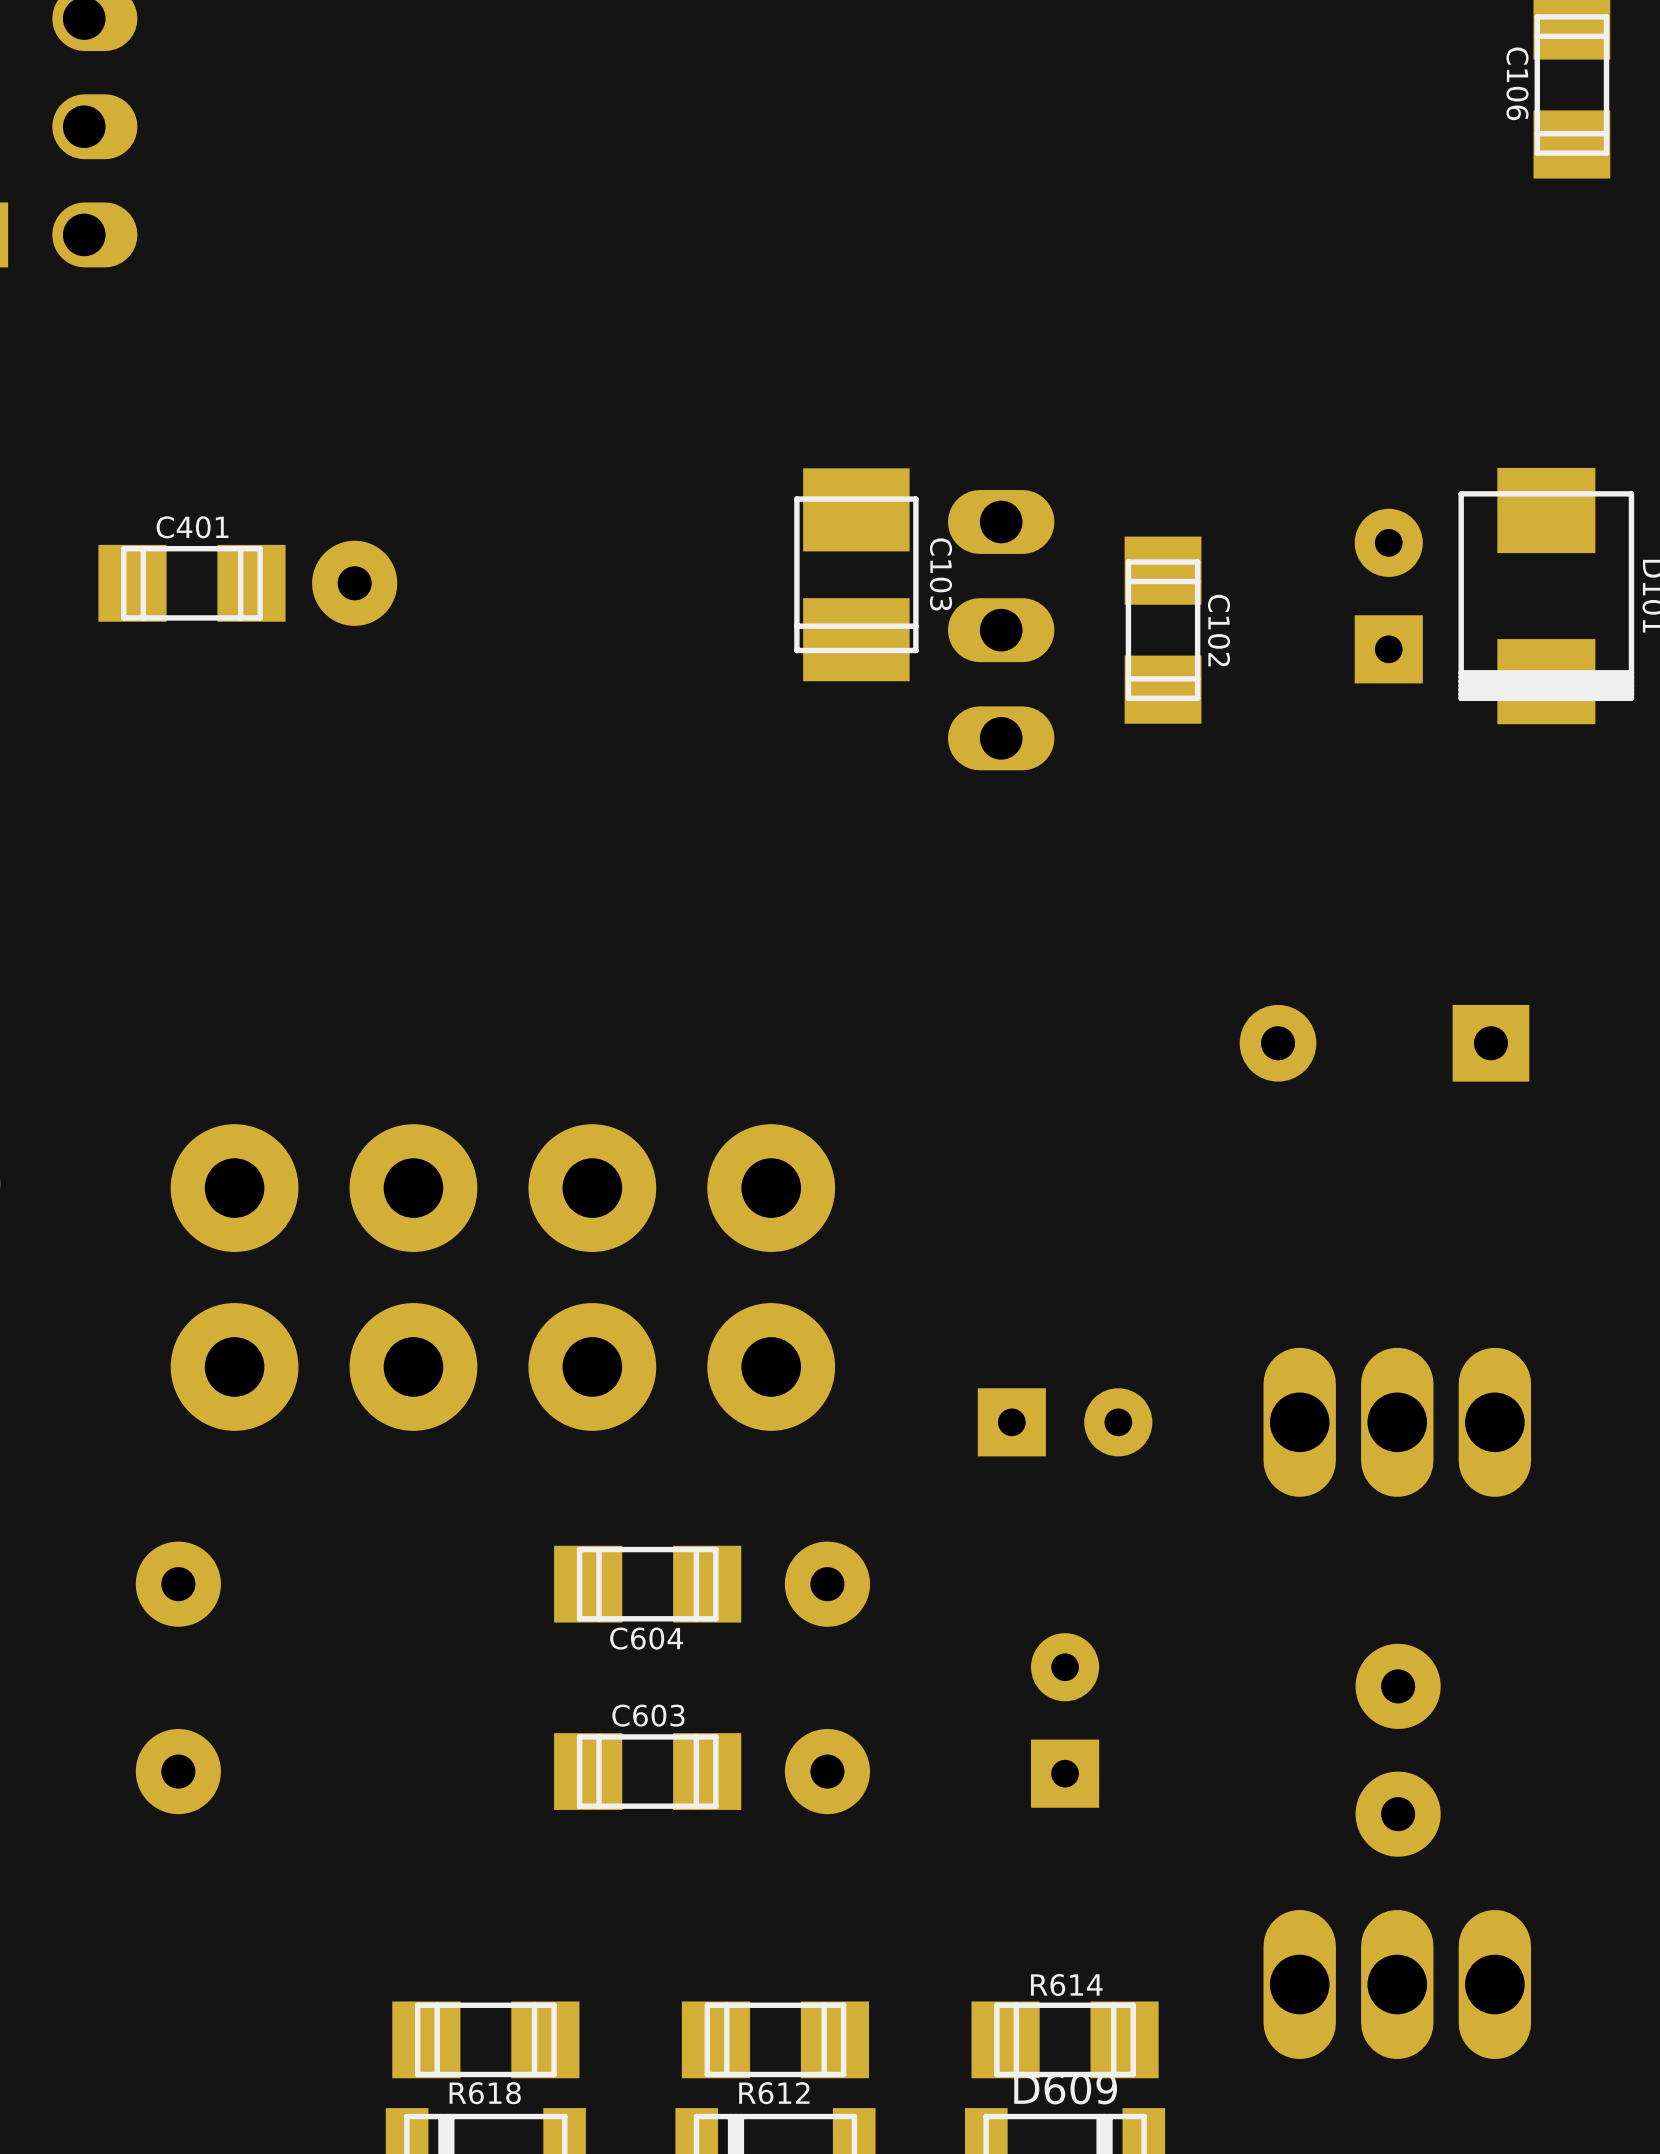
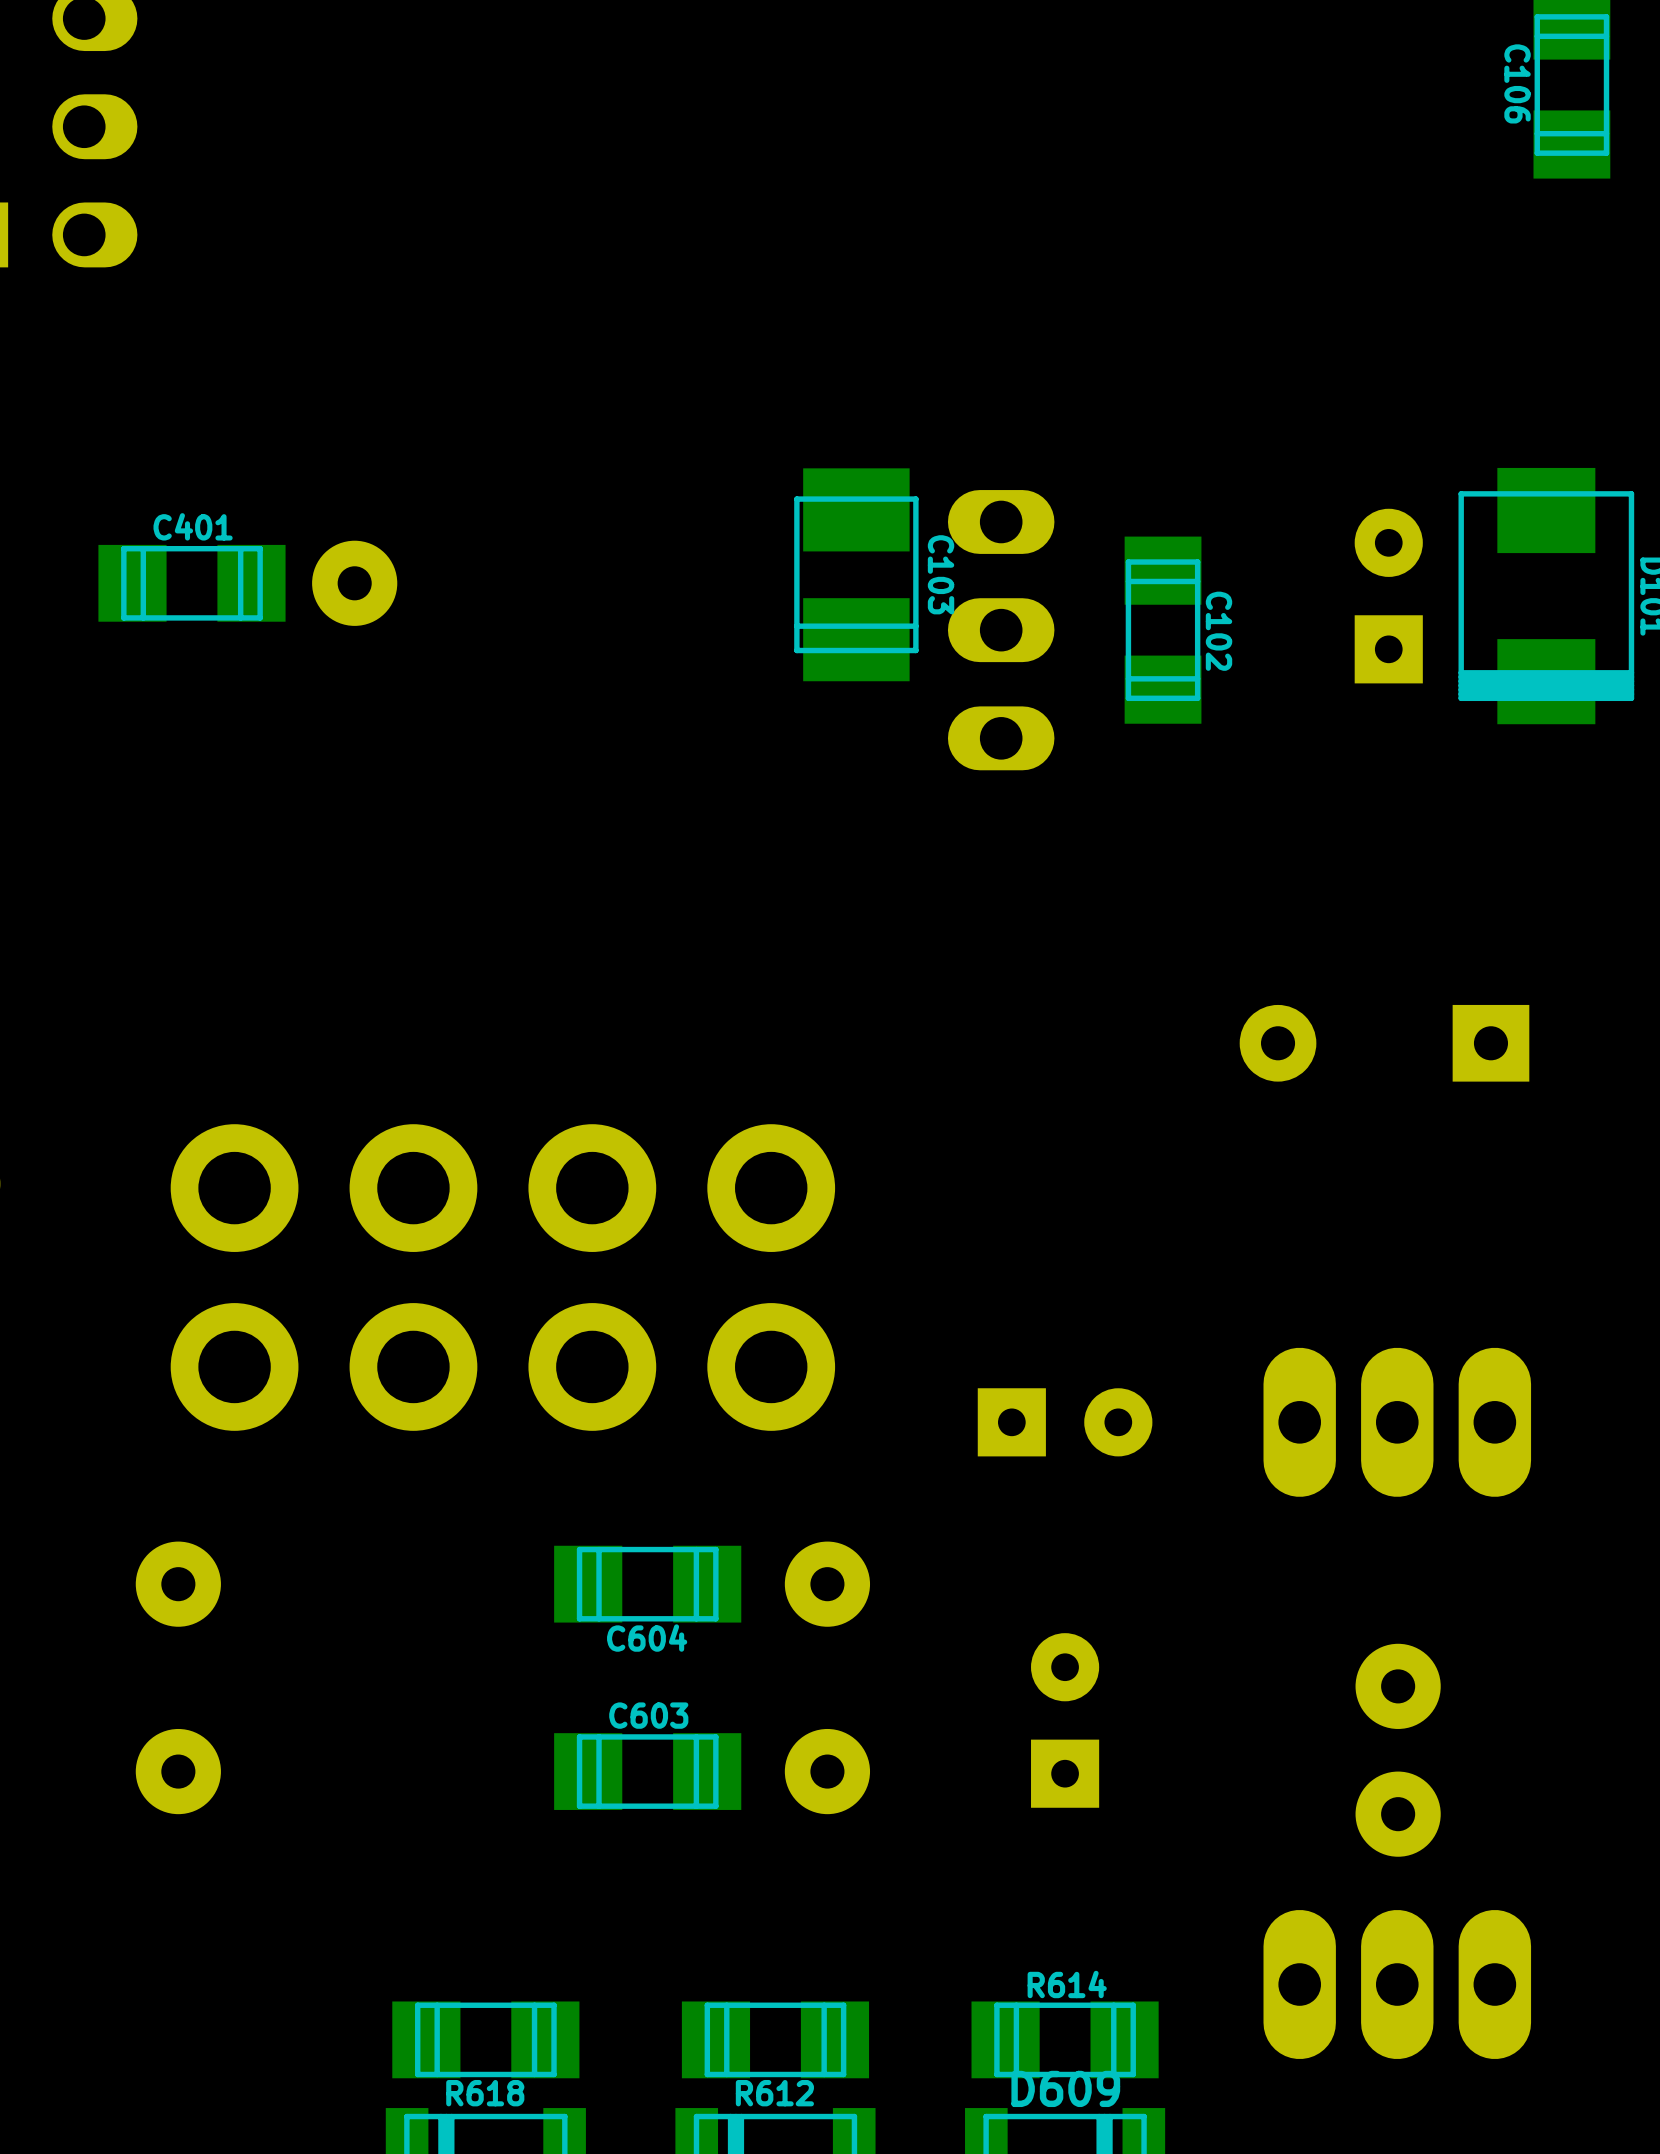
part footprint: [170, 1124, 836, 1431] -> [170, 1124, 836, 1431]
part footprint: [1263, 1347, 1532, 1497] -> [1263, 1347, 1532, 1497]
part footprint: [1263, 1909, 1532, 2060] -> [1263, 1909, 1532, 2060]

